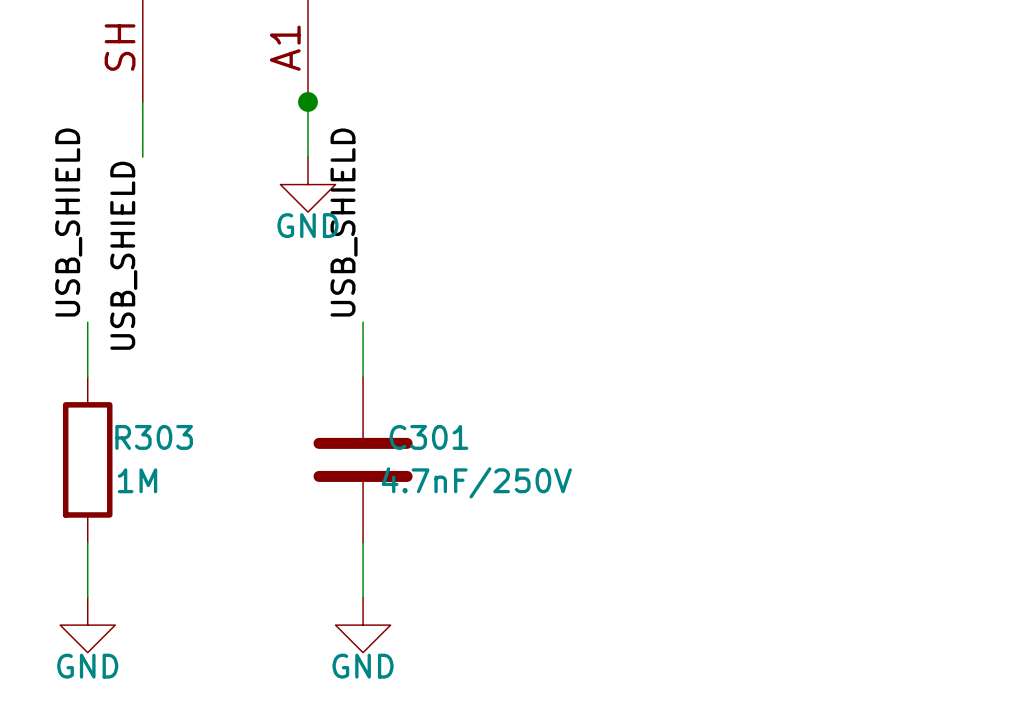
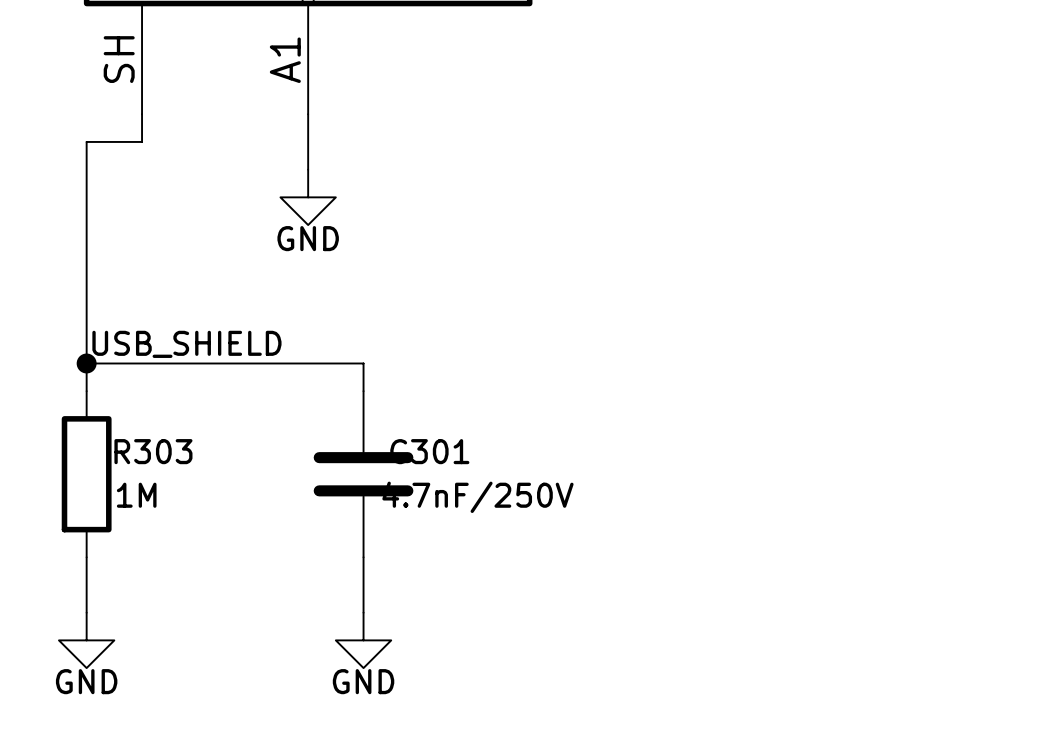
junction: (307, 101) -> none
wire: (142, 129) (142, 157) -> (142, 141) (86, 141) (86, 335)
label rotation: 0° (68, 222) -> 90° clockwise (186, 344)
label: USB_SHIELD (344, 222) -> none
label: USB_SHIELD (123, 255) -> none
wire: (363, 322) (363, 349) -> (86, 363) (363, 363)
junction: none -> (86, 363)

